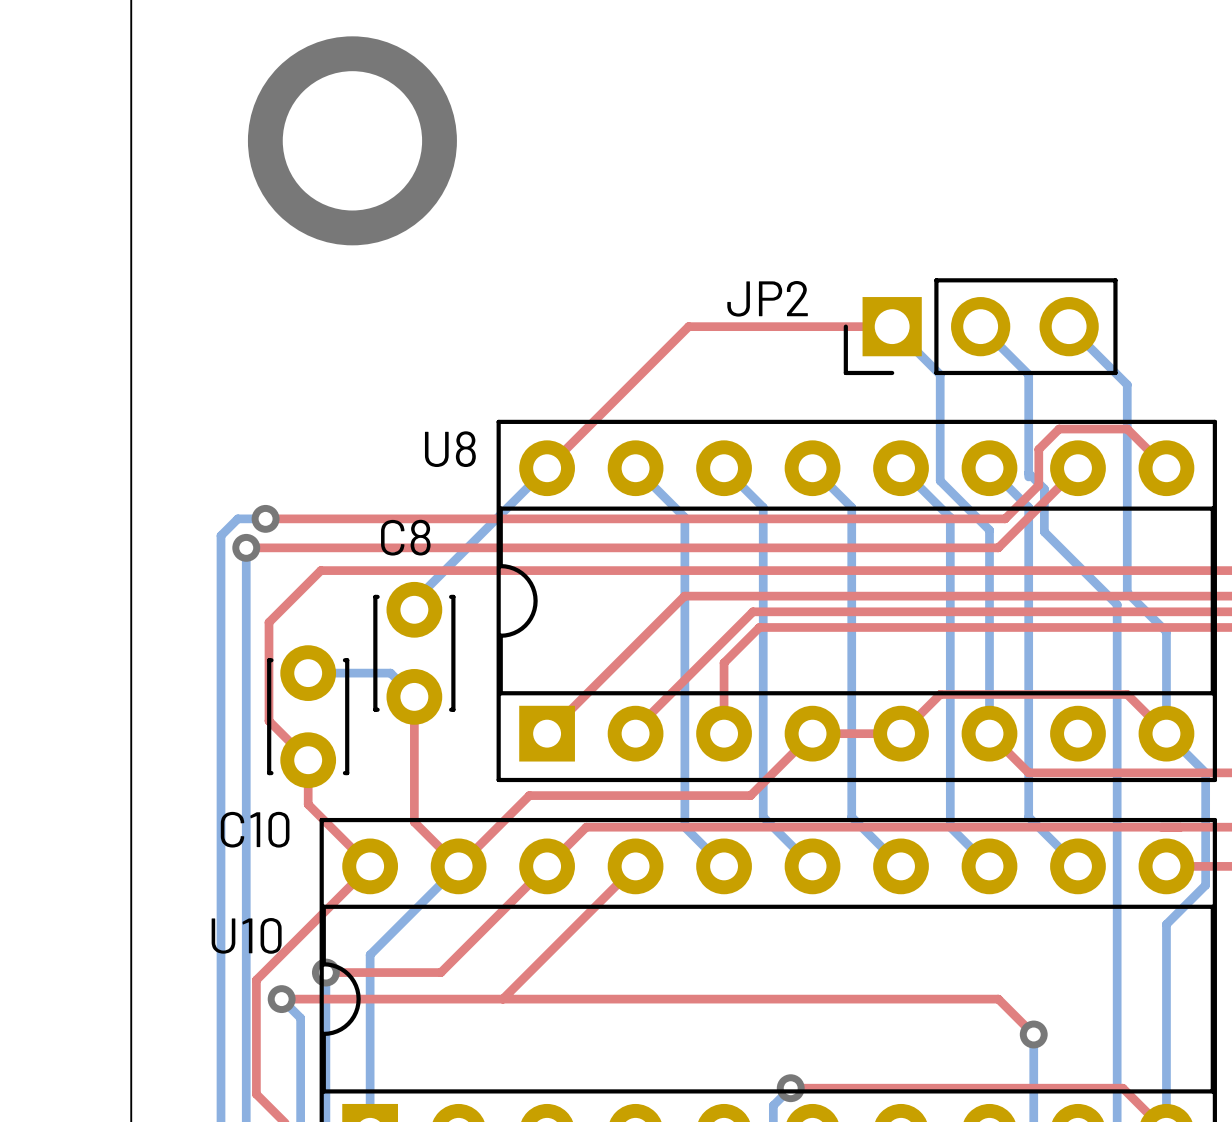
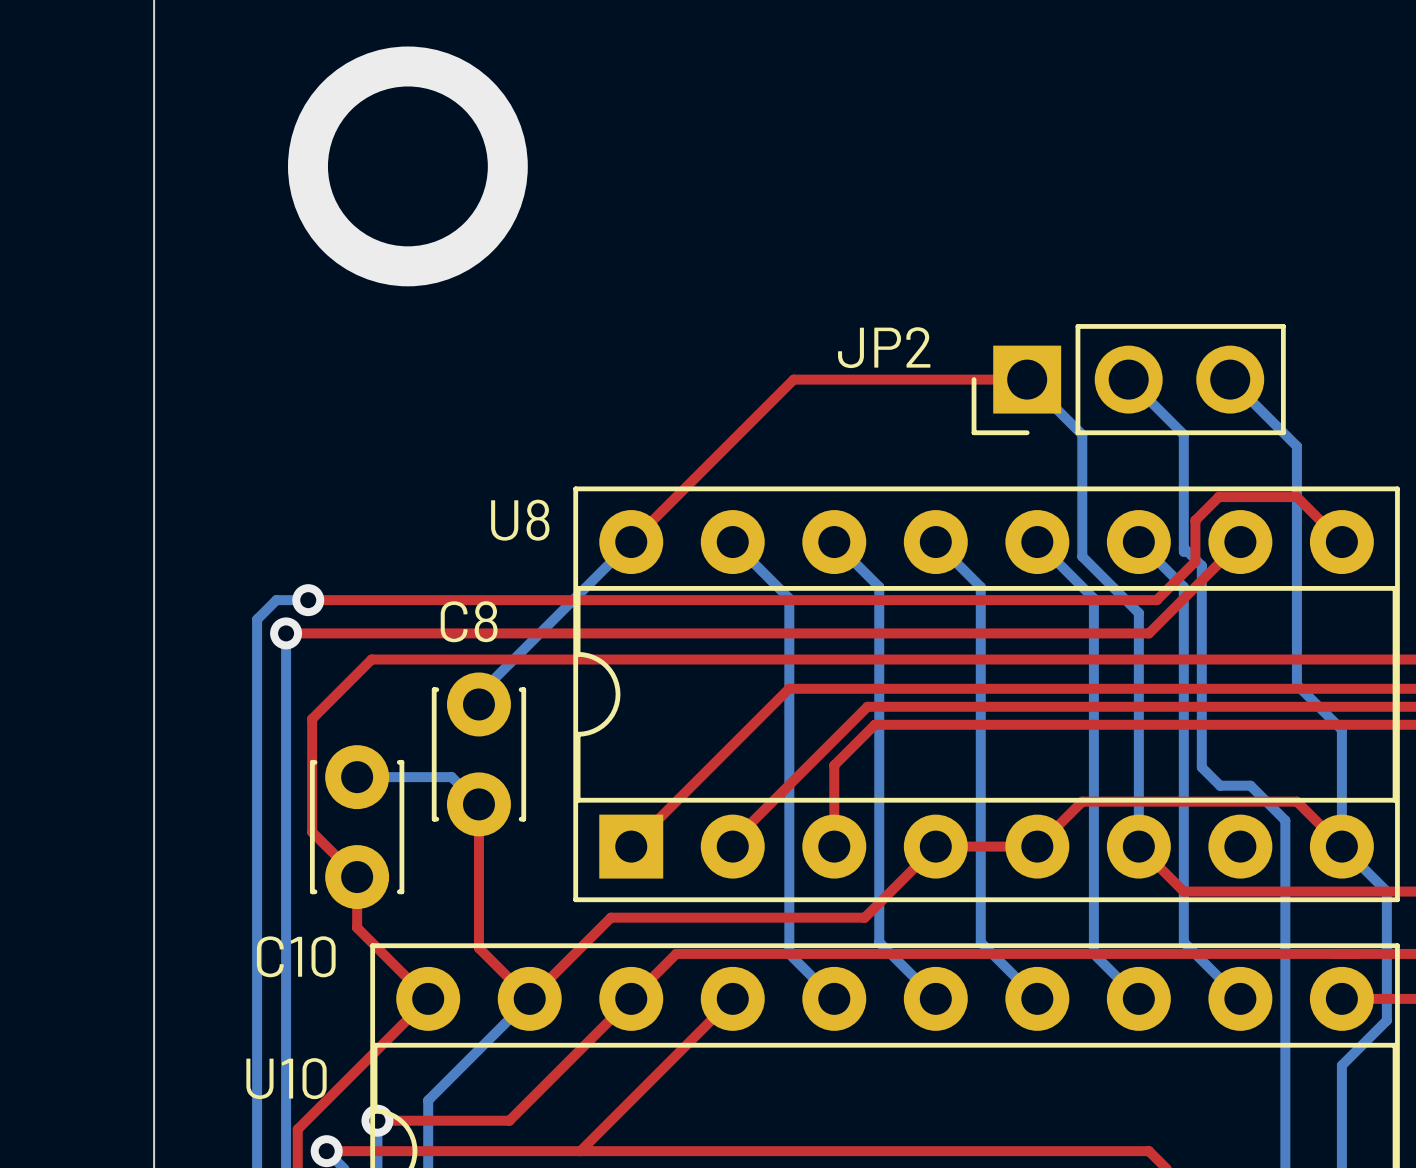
bottom track: (1044, 531) (1117, 604) (1117, 710) -> (1201, 615) (1201, 767) (1220, 785) (1250, 785) (1285, 820)

